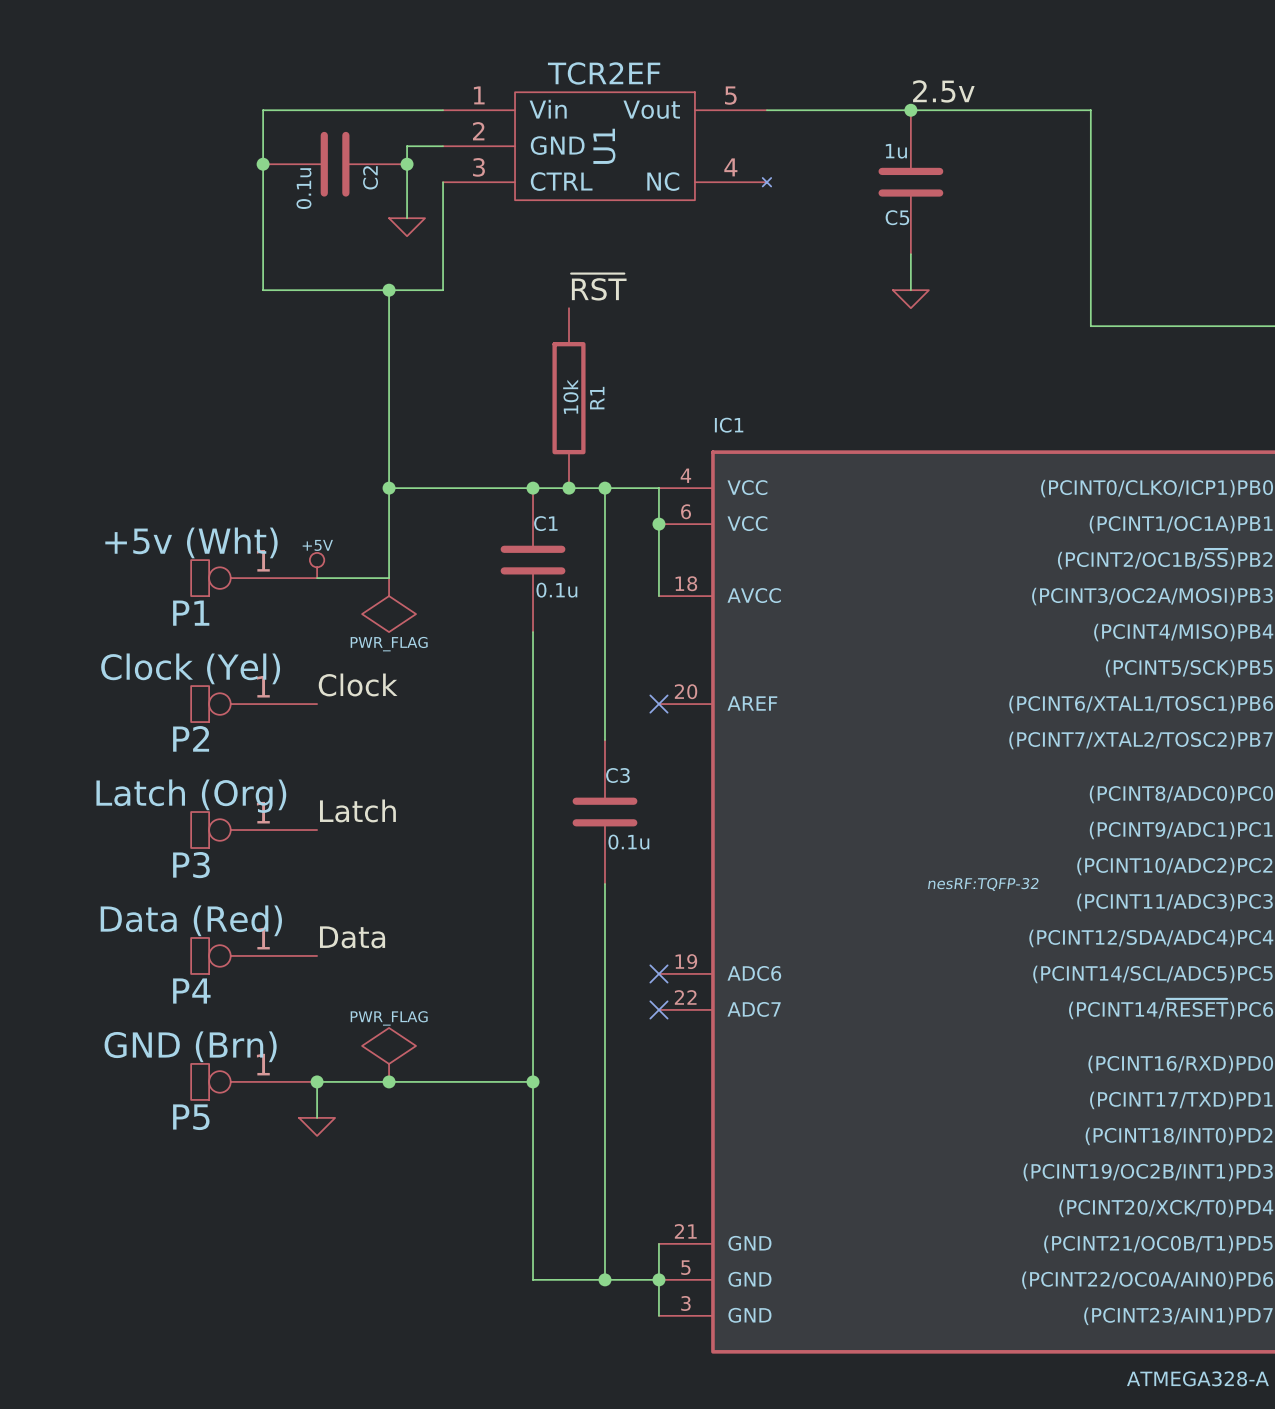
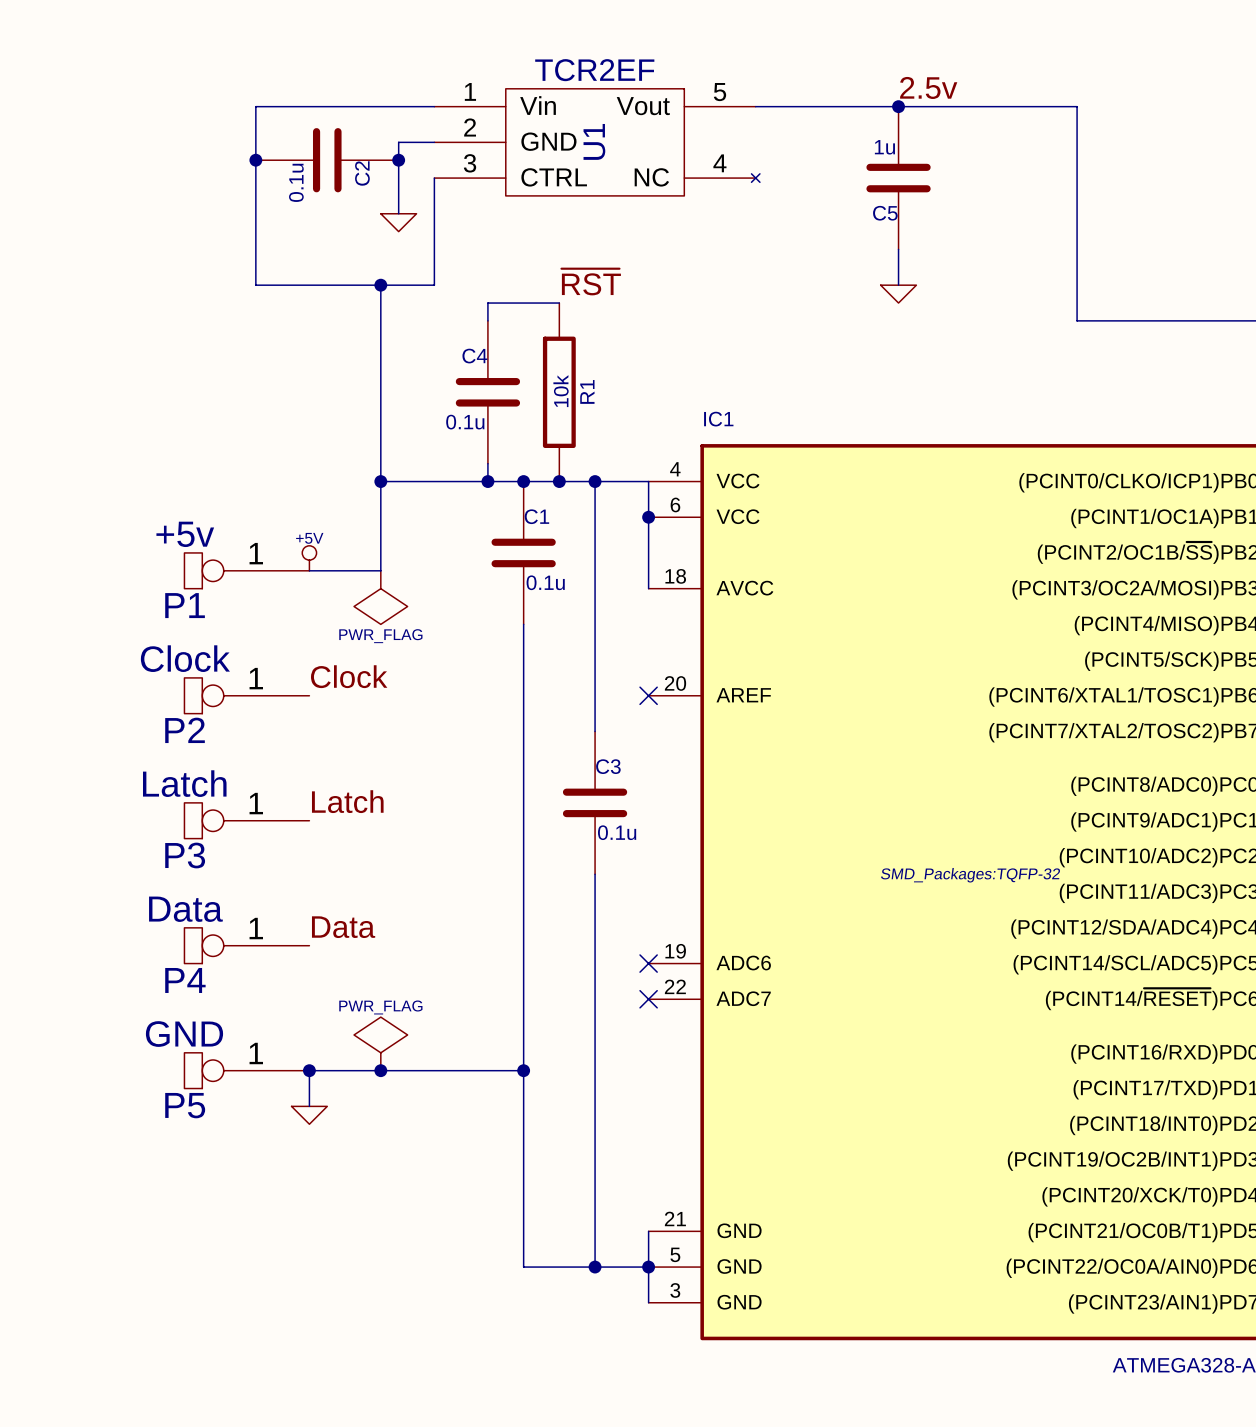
wire: none -> (559, 303) (487, 303) (487, 320)
C4: none -> 0.1u (487, 392)
wire: none -> (487, 463) (487, 481)
junction: none -> (487, 481)
P1 value: +5v (Wht) (191, 542) -> +5v (185, 534)
P2 value: Clock (Yel) (190, 668) -> Clock (185, 658)
P3 value: Latch (Org) (191, 796) -> Latch (184, 783)
IC1 text: nesRF:TQFP-32 (983, 884) -> SMD_Packages:TQFP-32 (970, 875)
P4 value: Data (Red) (191, 920) -> Data (185, 909)
P5 value: GND (Brn) (190, 1046) -> GND (184, 1034)

